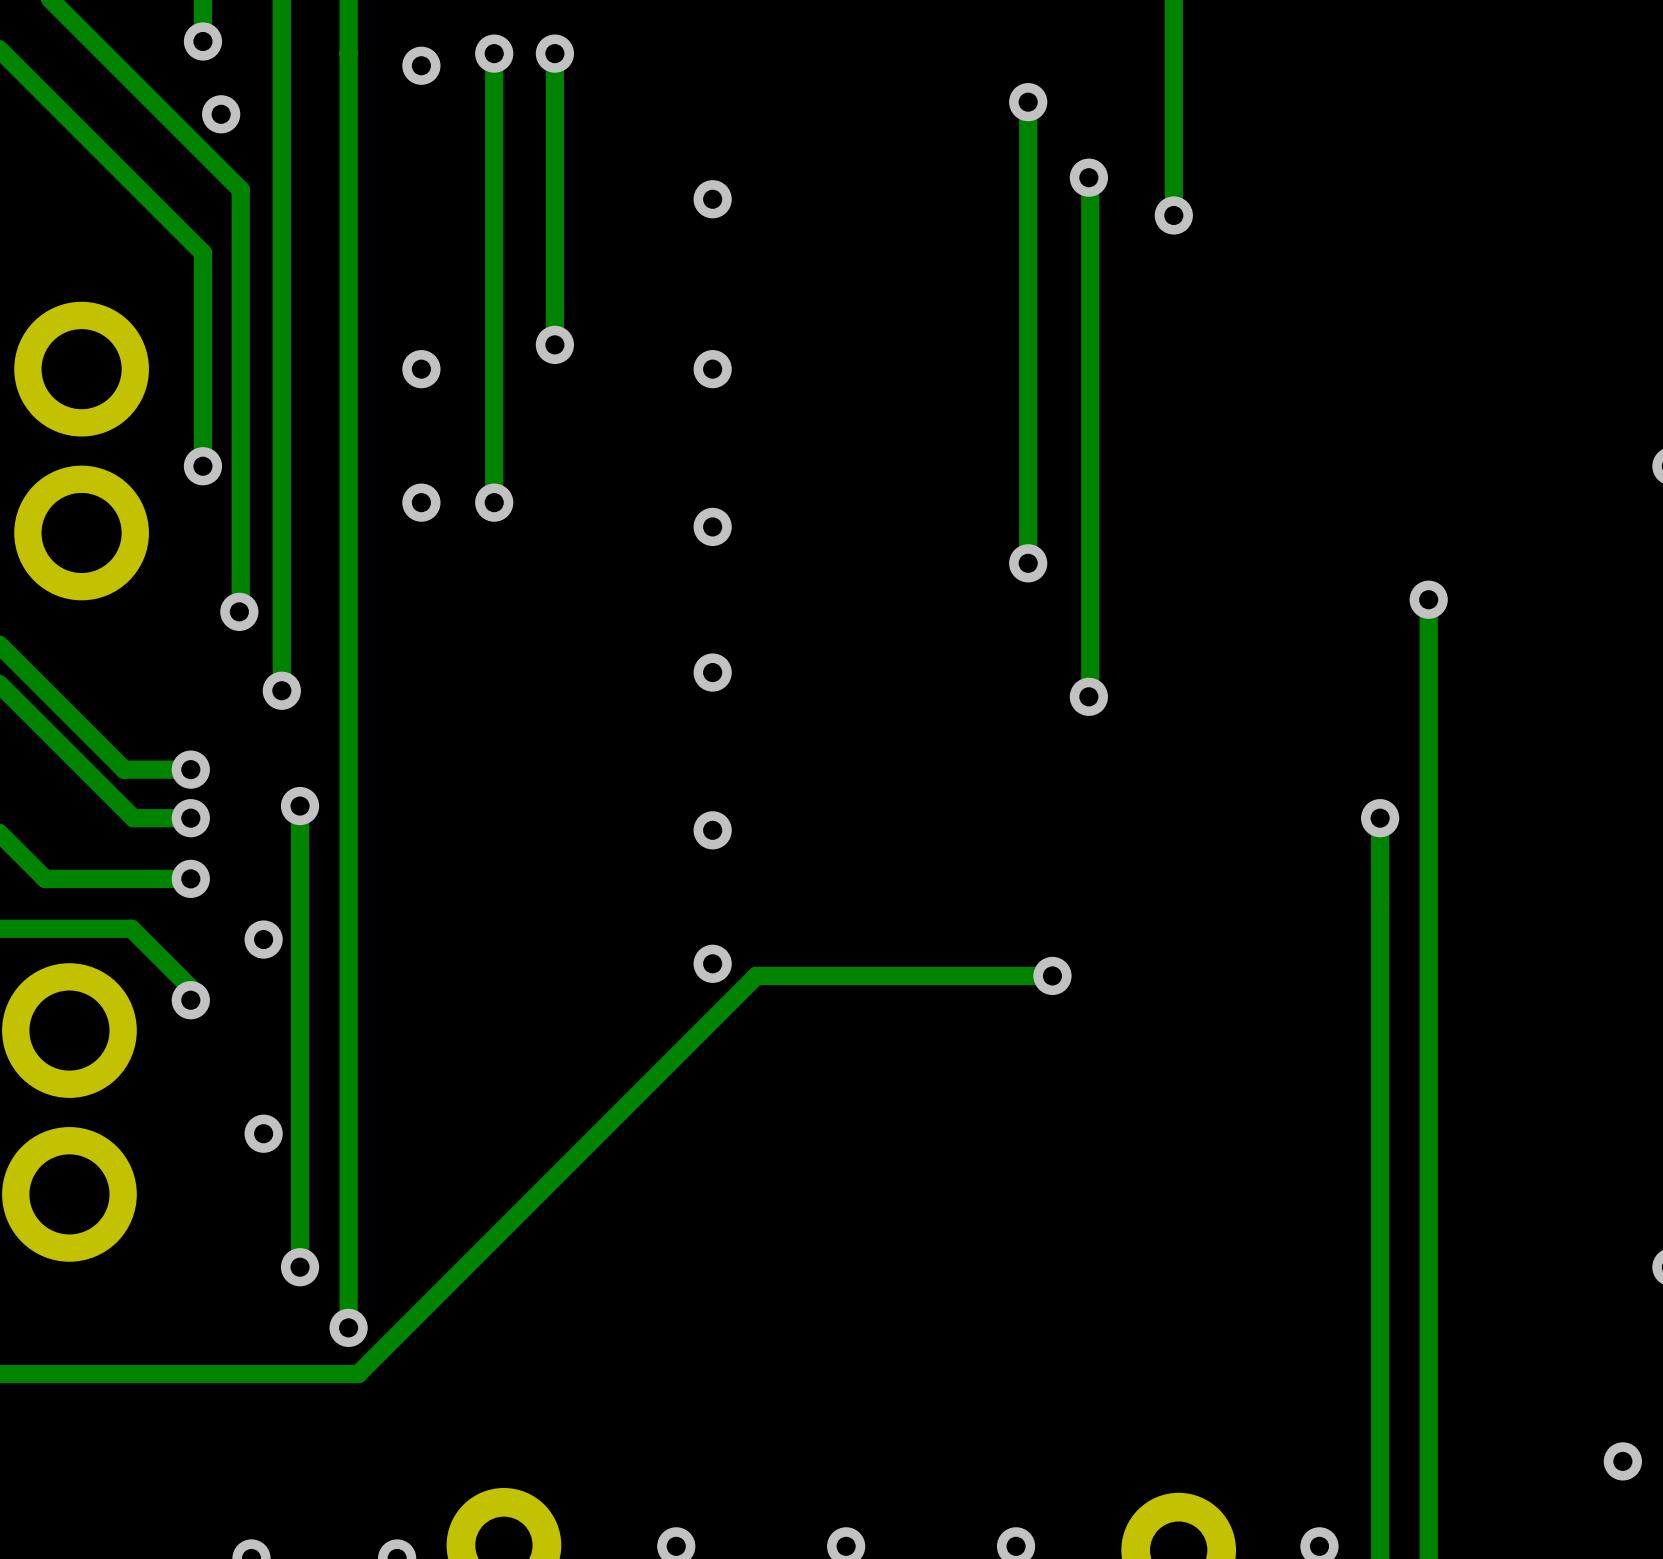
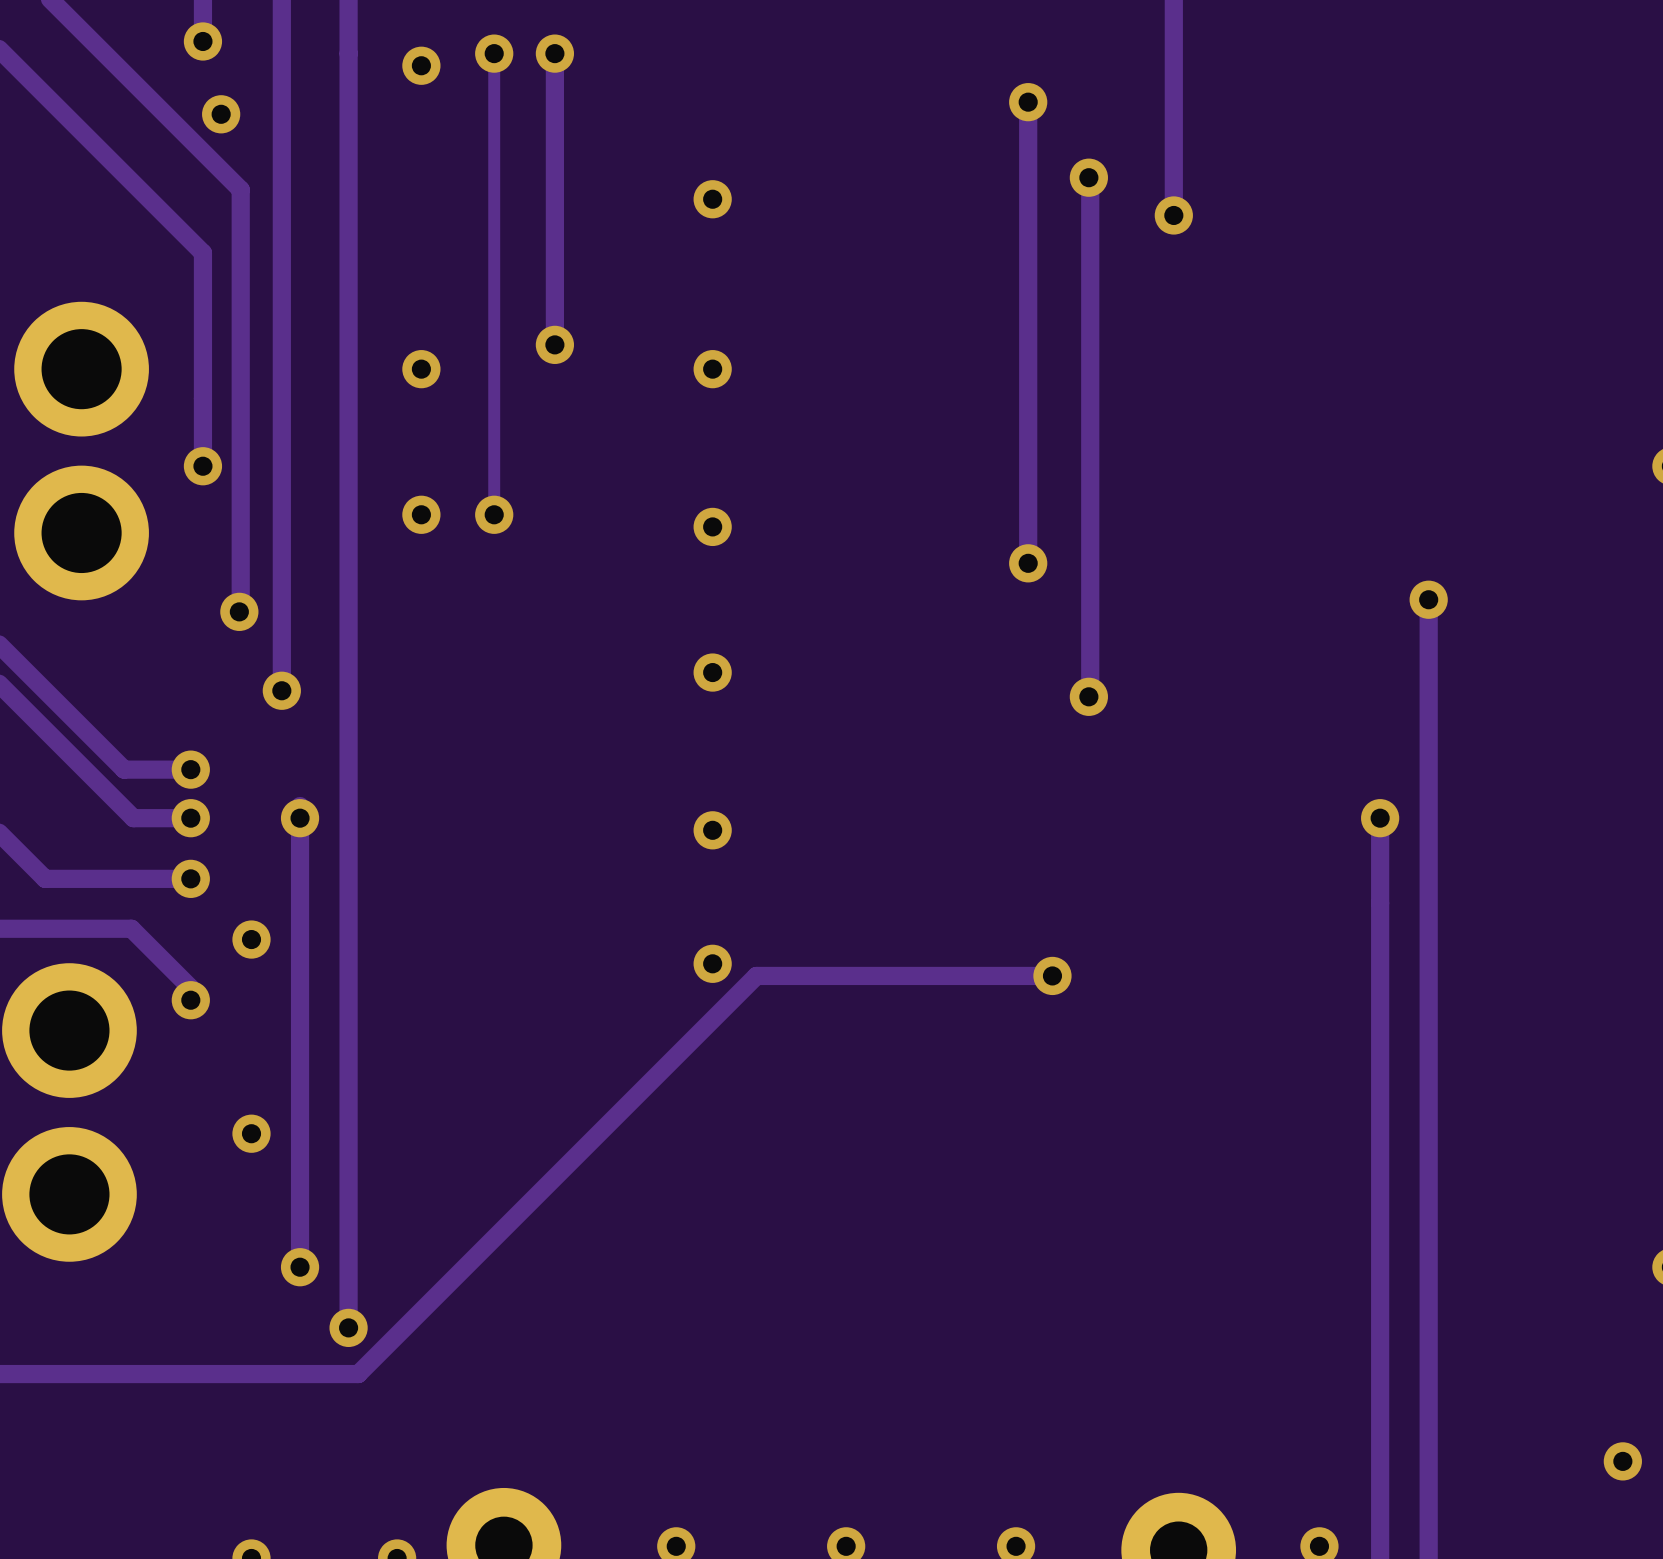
track width: thick (494, 53) (494, 502) -> thin (494, 53) (494, 502)
via position: (421, 502) -> (421, 514)
via position: (494, 502) -> (494, 514)
via position: (300, 806) -> (300, 818)
via position: (263, 939) -> (251, 939)
via position: (263, 1133) -> (251, 1133)

